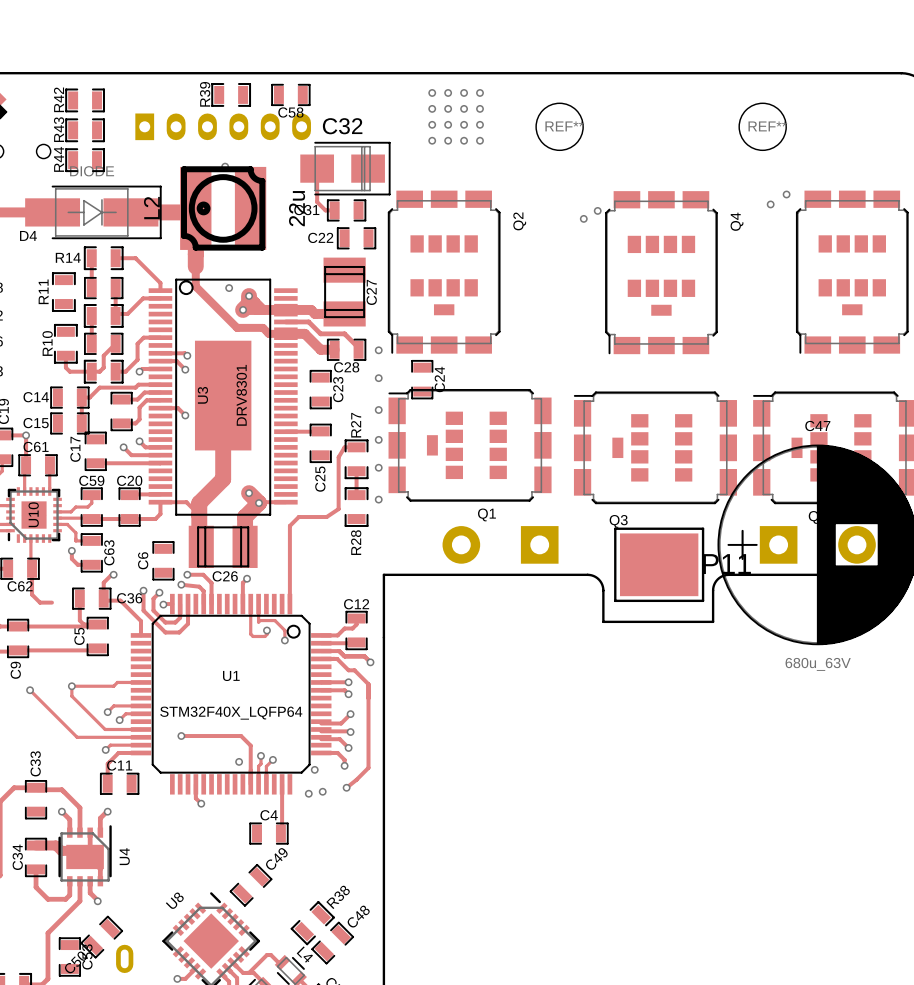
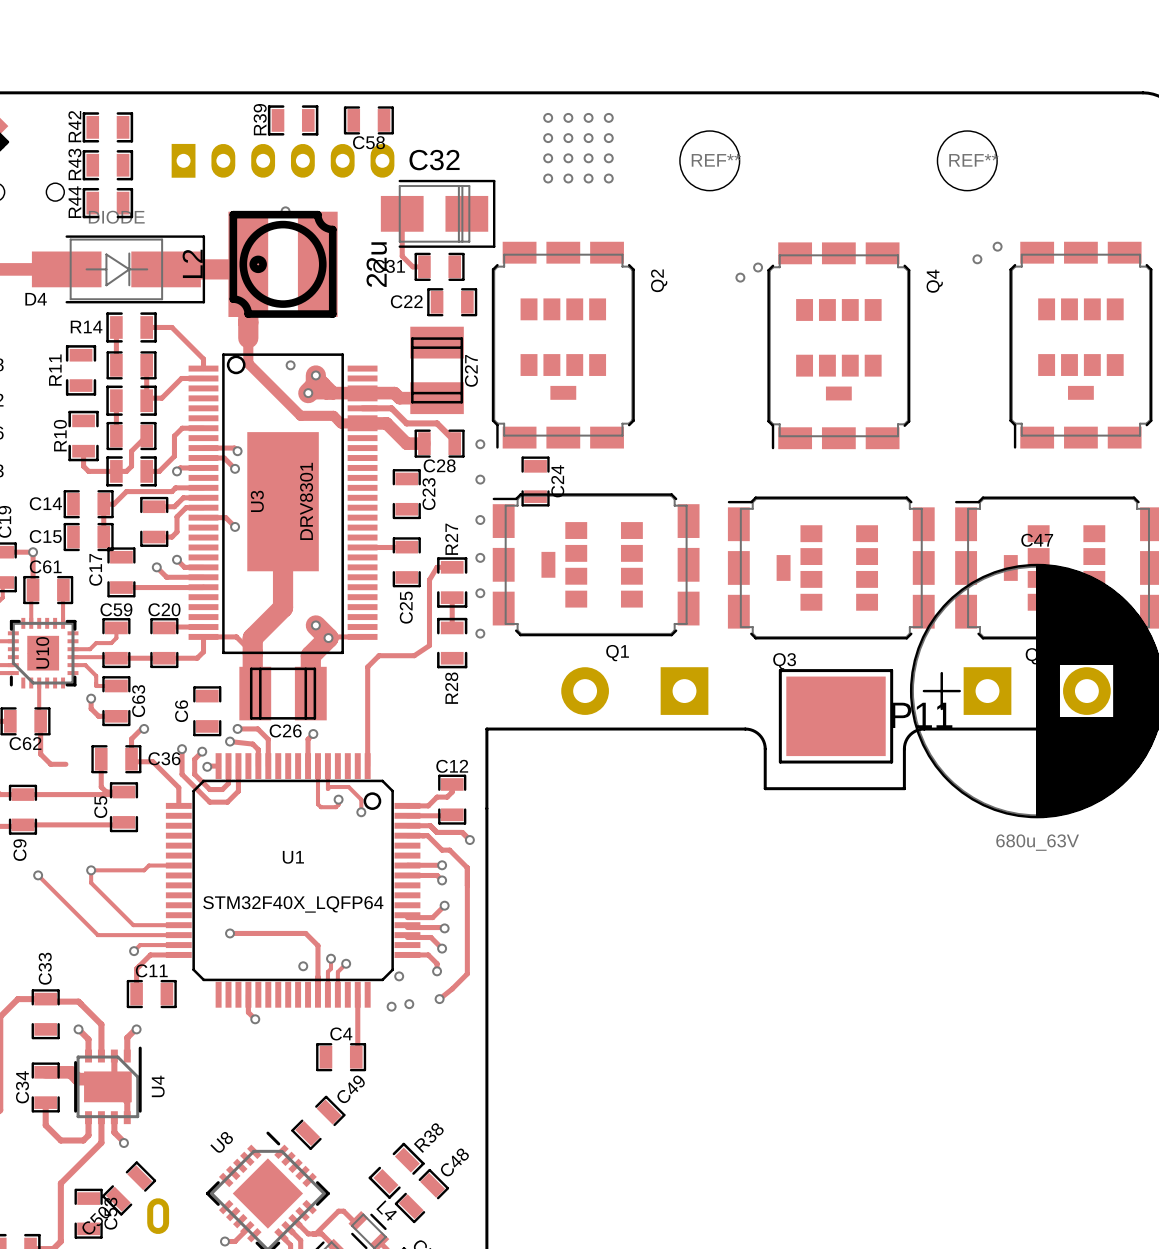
track: (140, 705) (113, 705) (107, 712) -> none
via: (107, 712) -> none
track: (140, 713) (125, 713) (119, 720) -> none
via: (119, 720) -> none

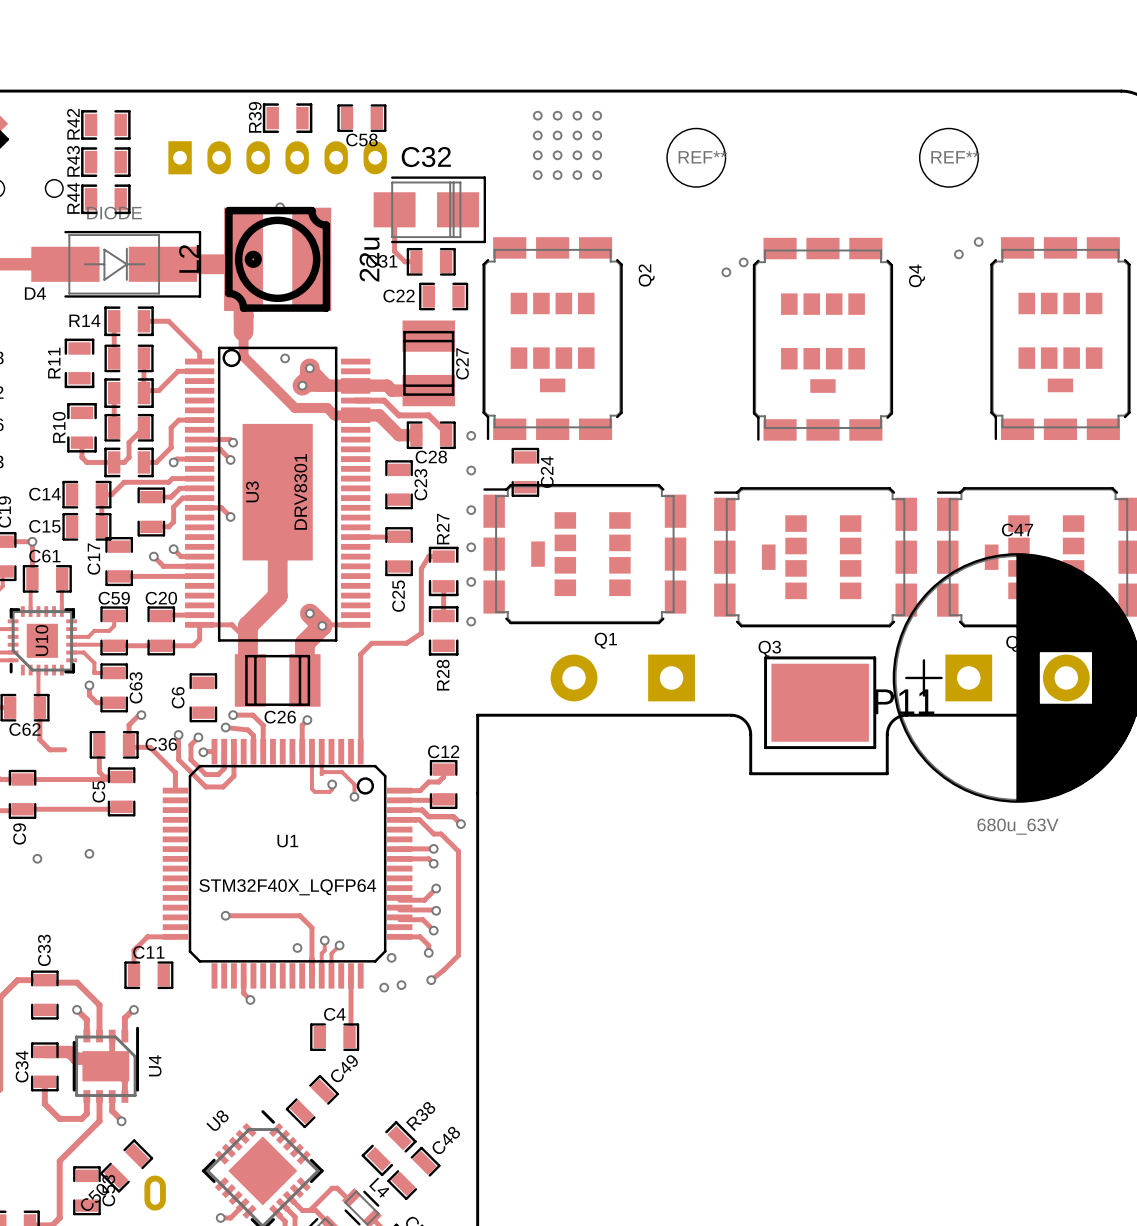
track: (178, 865) (148, 865) (144, 870) (91, 870) (91, 882) (133, 925) (178, 925) -> none
track: (38, 875) (97, 935) (178, 935) -> none
track: (178, 945) (140, 945) (134, 951) -> none
via: (134, 951) -> none

